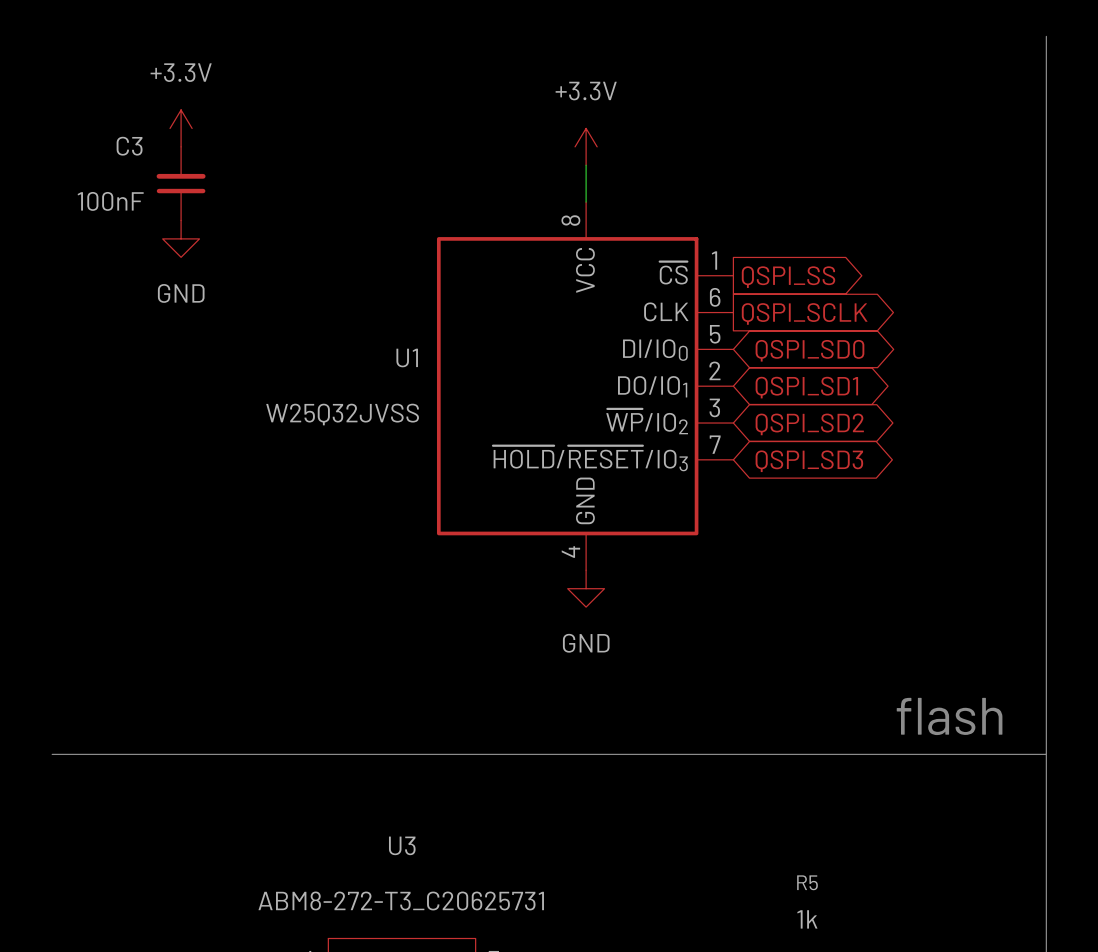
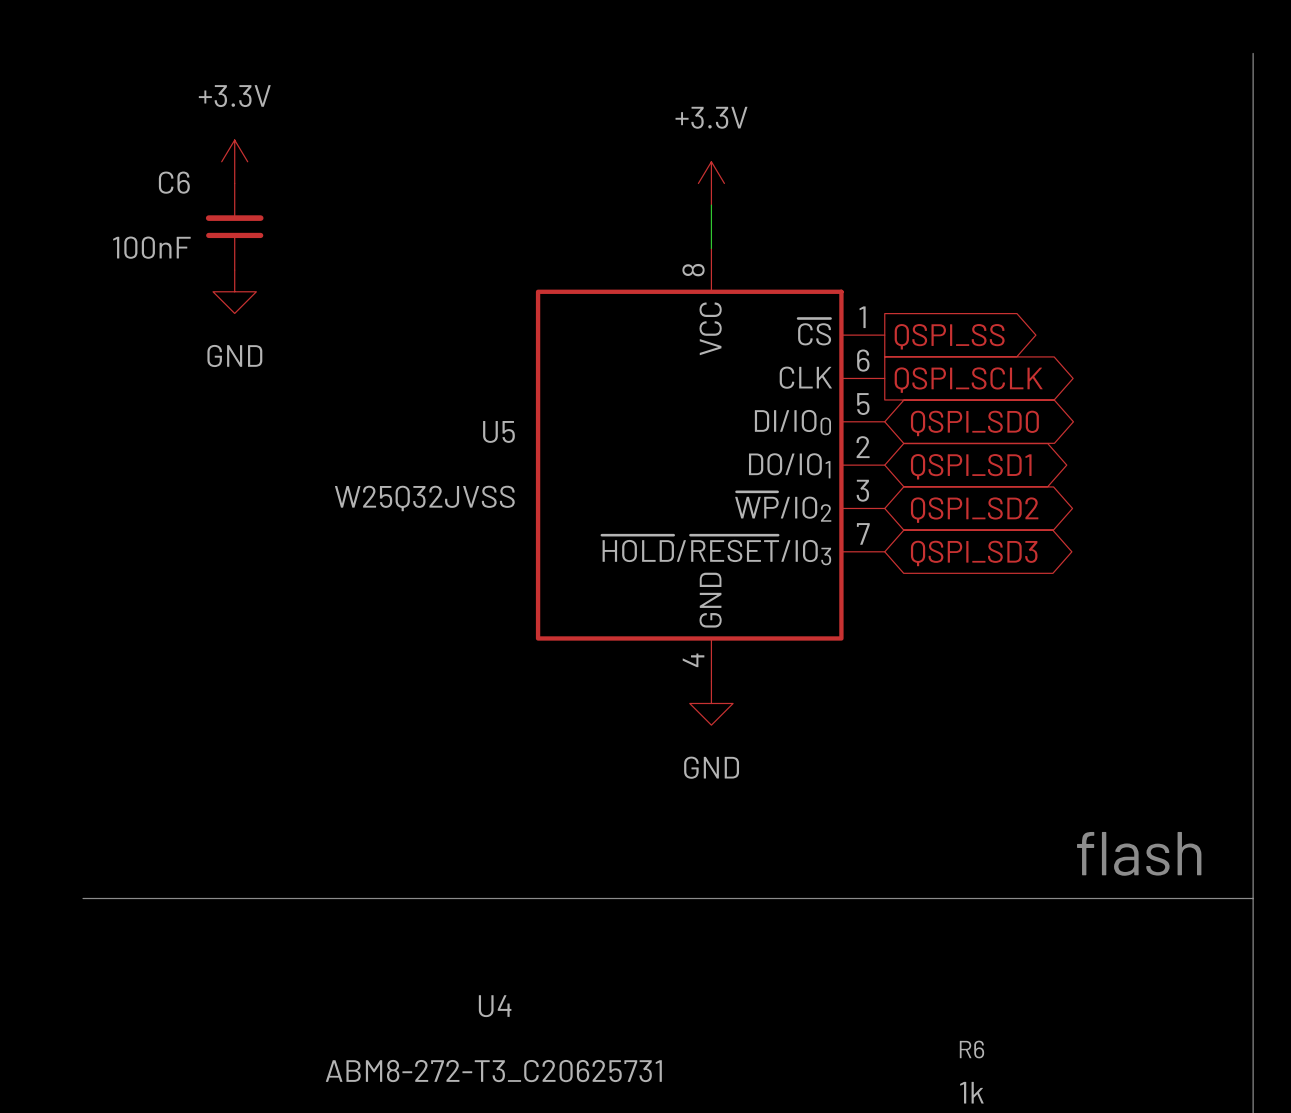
C3 name: C3 (129, 146) -> C6 (174, 182)
U1 name: U1 (407, 357) -> U5 (498, 431)
U3 name: U3 (402, 845) -> U4 (495, 1006)
R5 name: R5 (807, 882) -> R6 (971, 1049)

